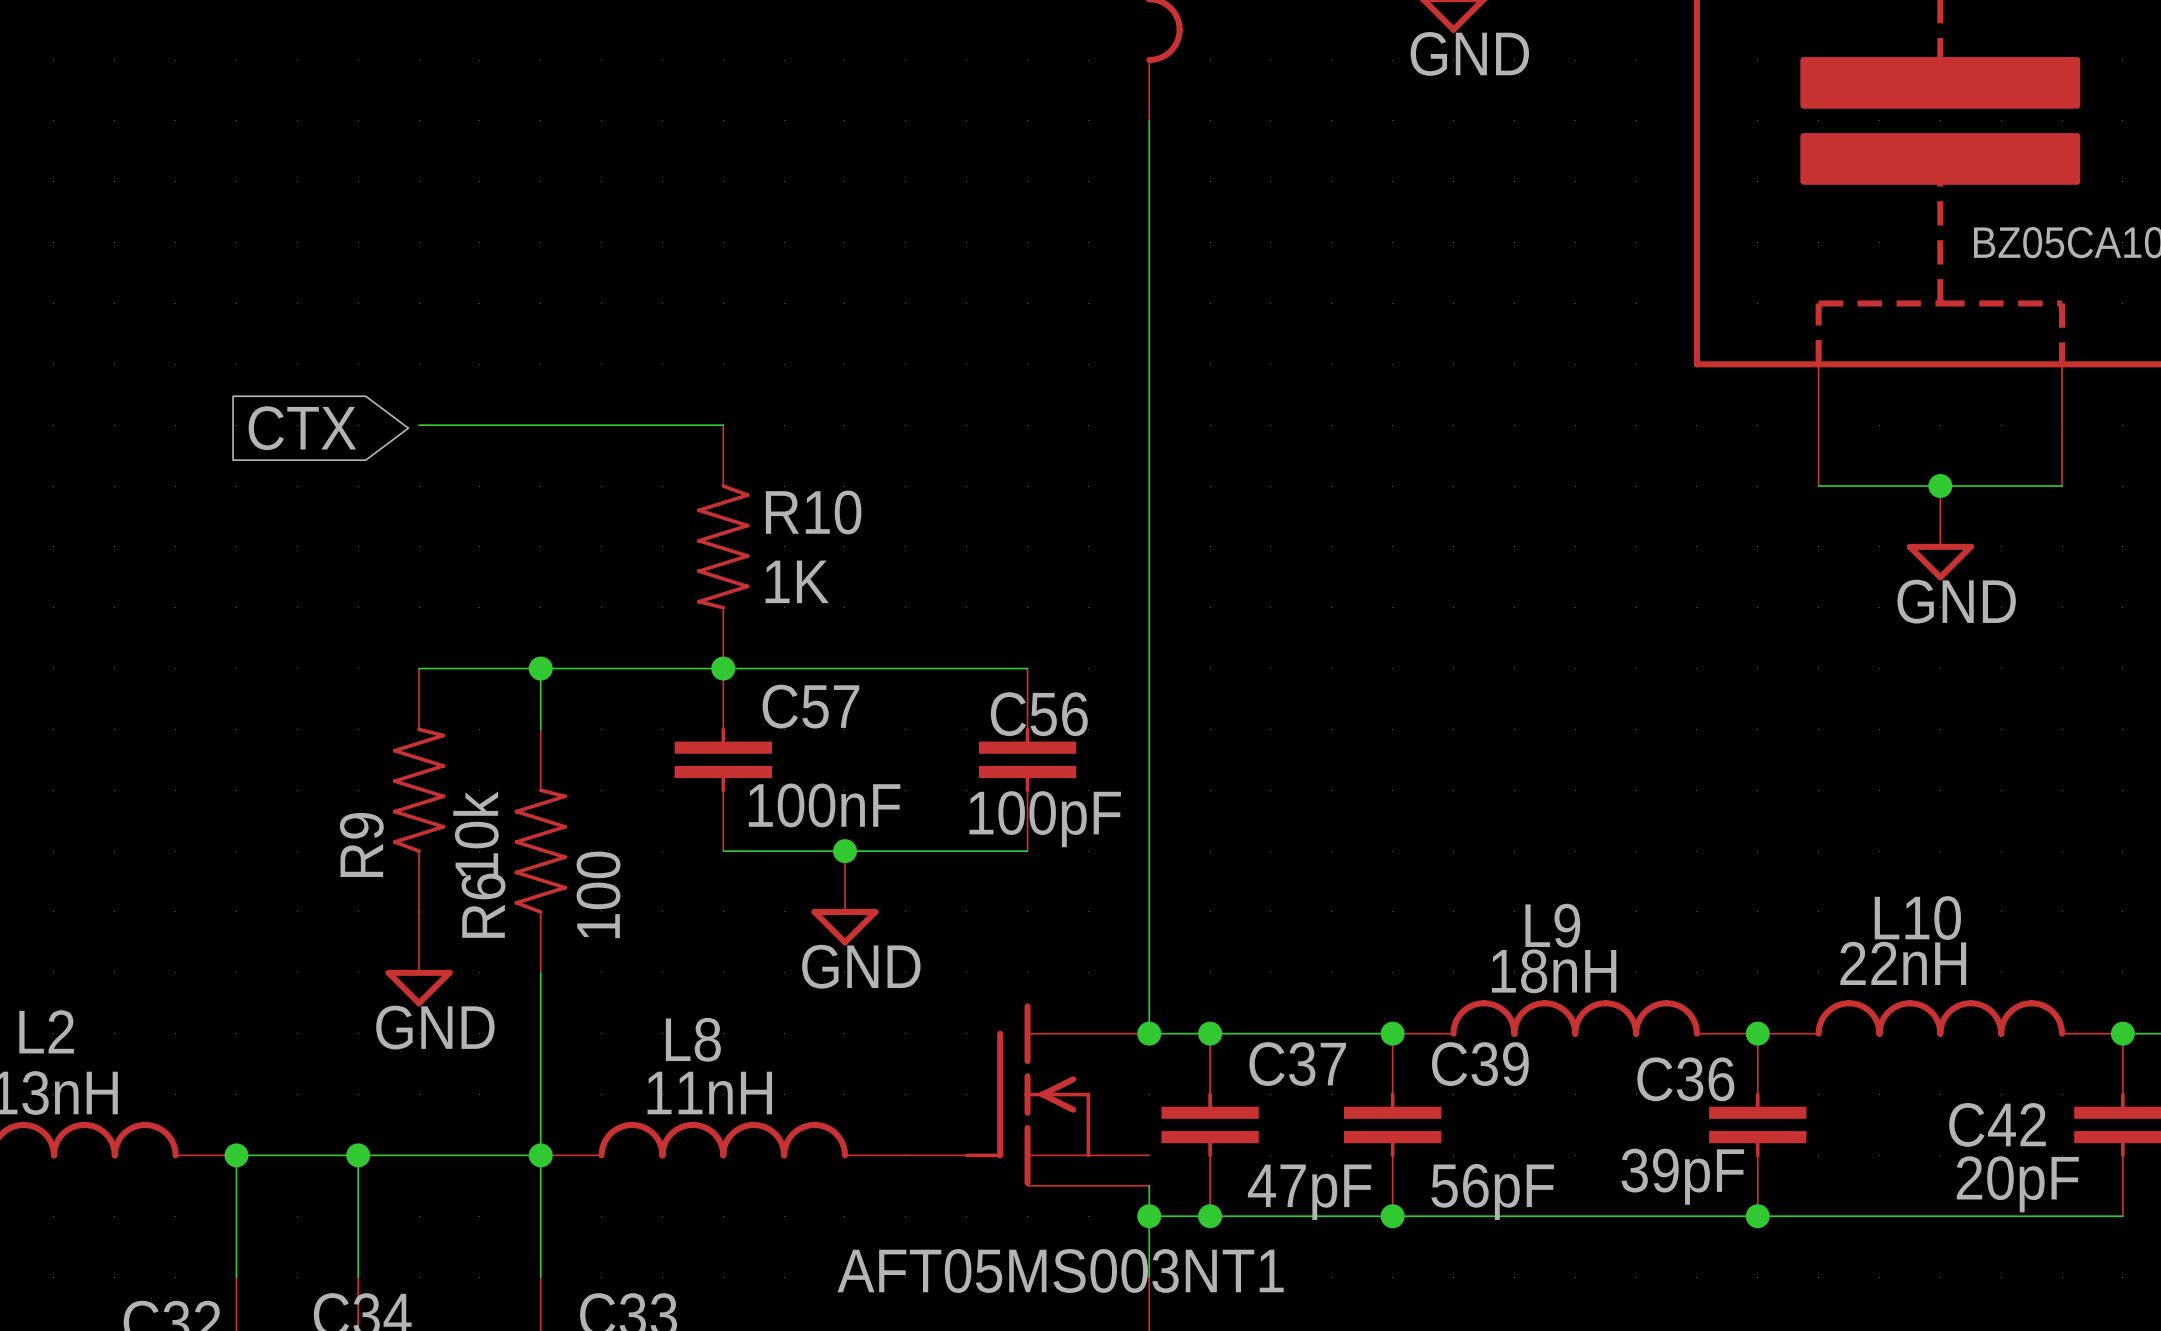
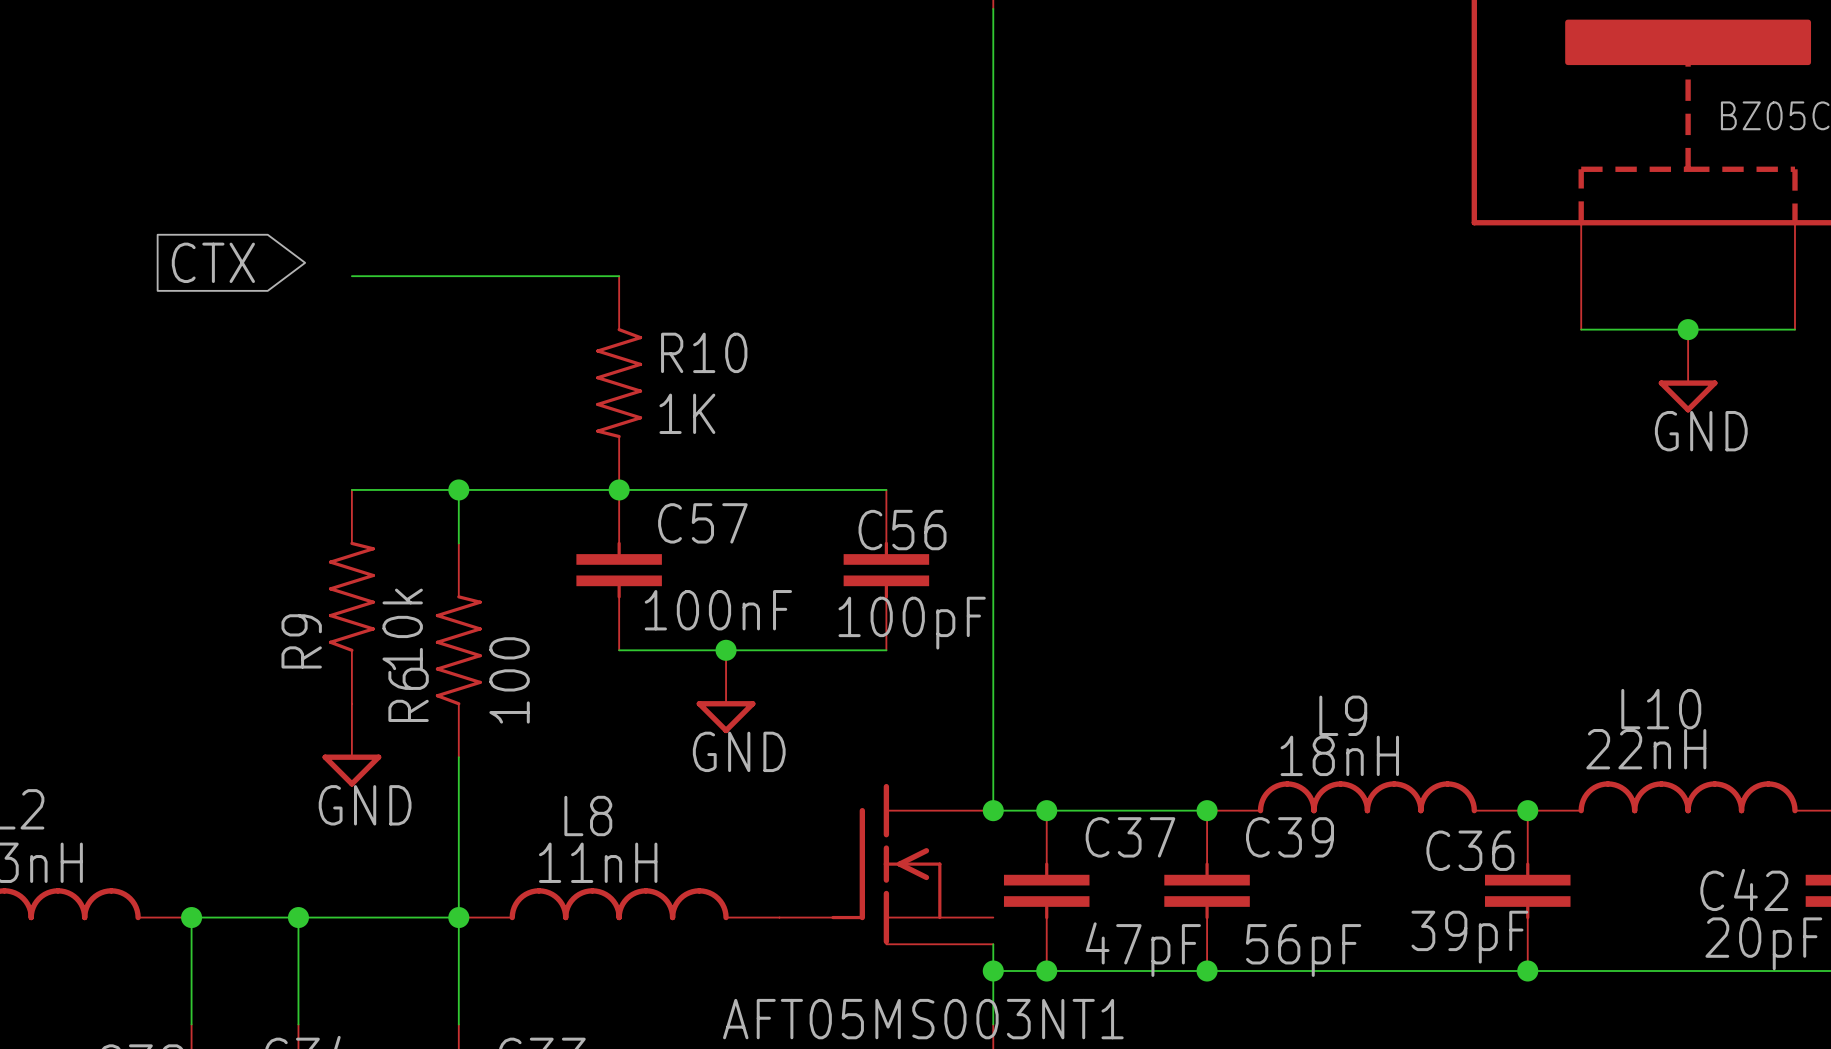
global label position: CTX (302, 428) -> CTX (213, 262)

